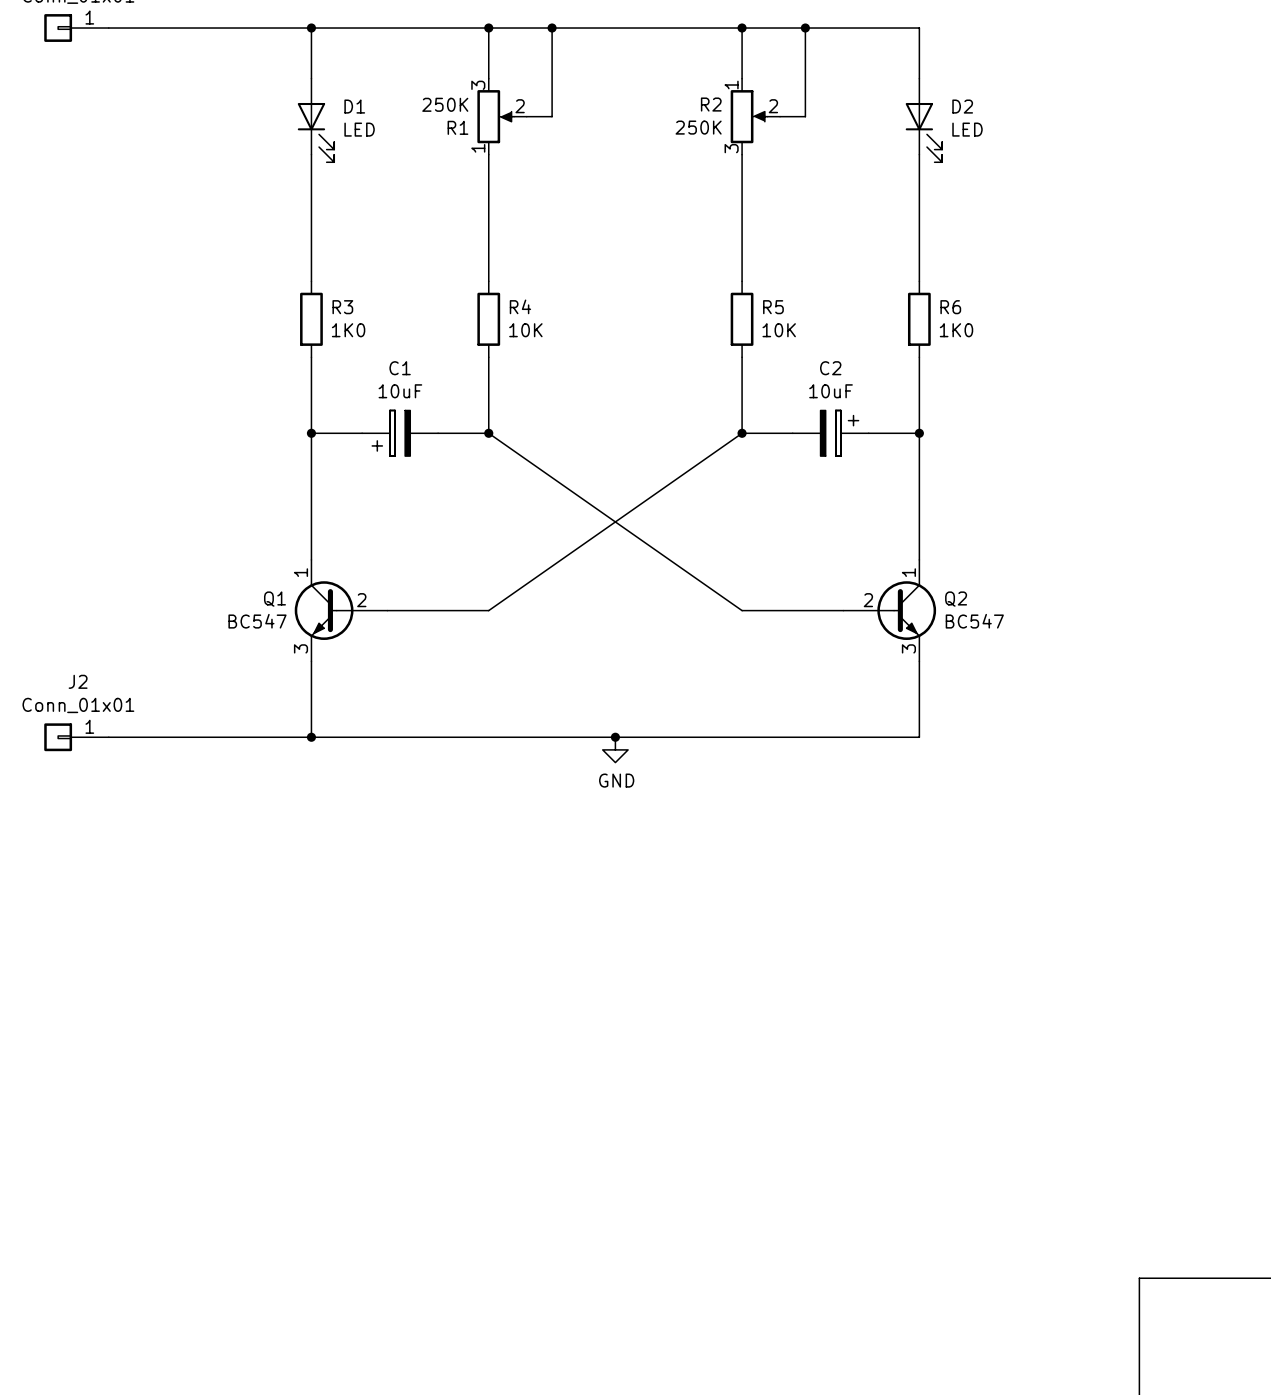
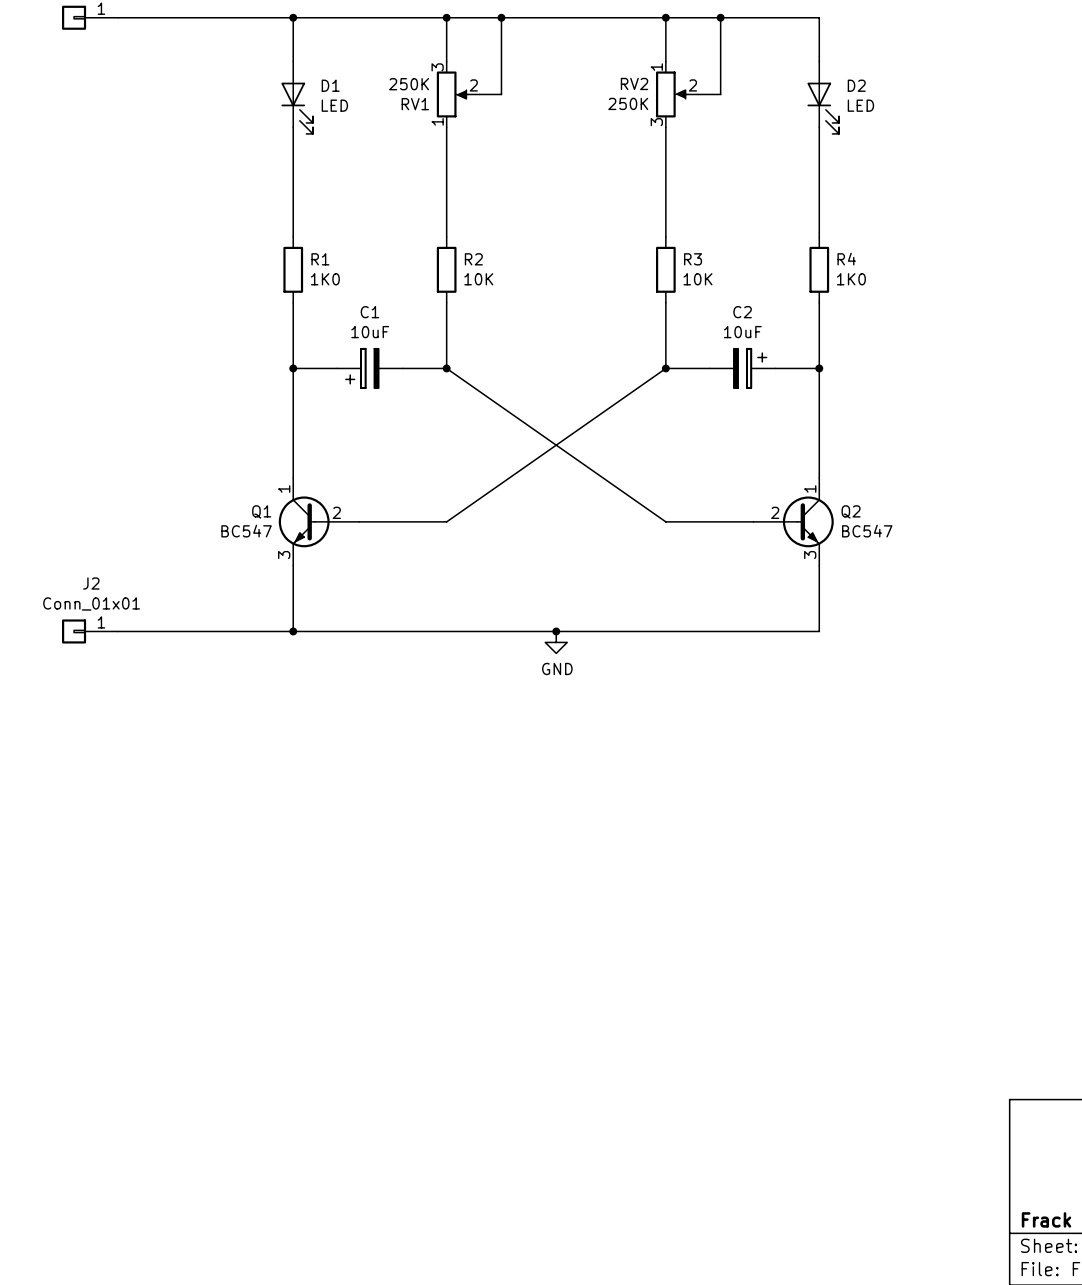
R2 name: R2 (711, 104) -> RV2 (634, 83)
R1 name: R1 (457, 127) -> RV1 (415, 104)
R4 name: R4 (520, 306) -> R2 (473, 259)
R3 name: R3 (342, 307) -> R1 (320, 259)
R5 name: R5 (773, 307) -> R3 (693, 259)
R6 name: R6 (950, 307) -> R4 (846, 259)

